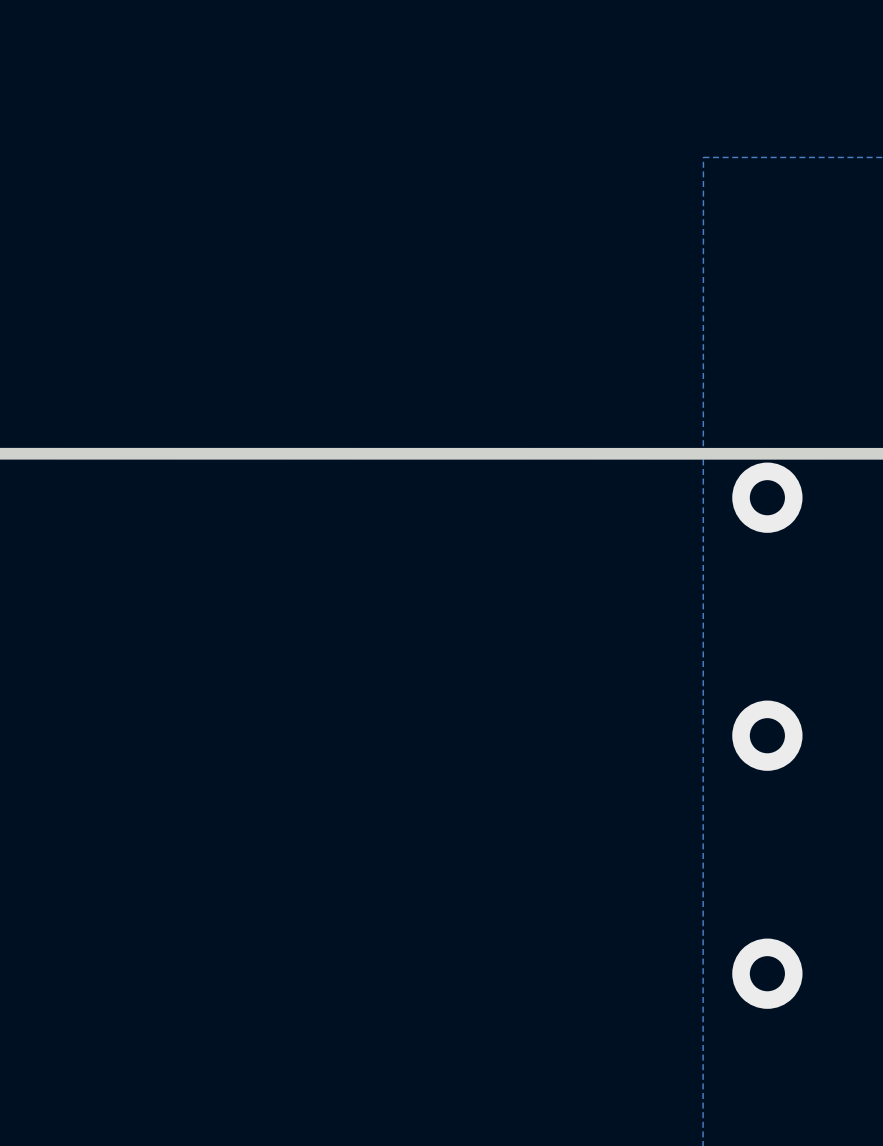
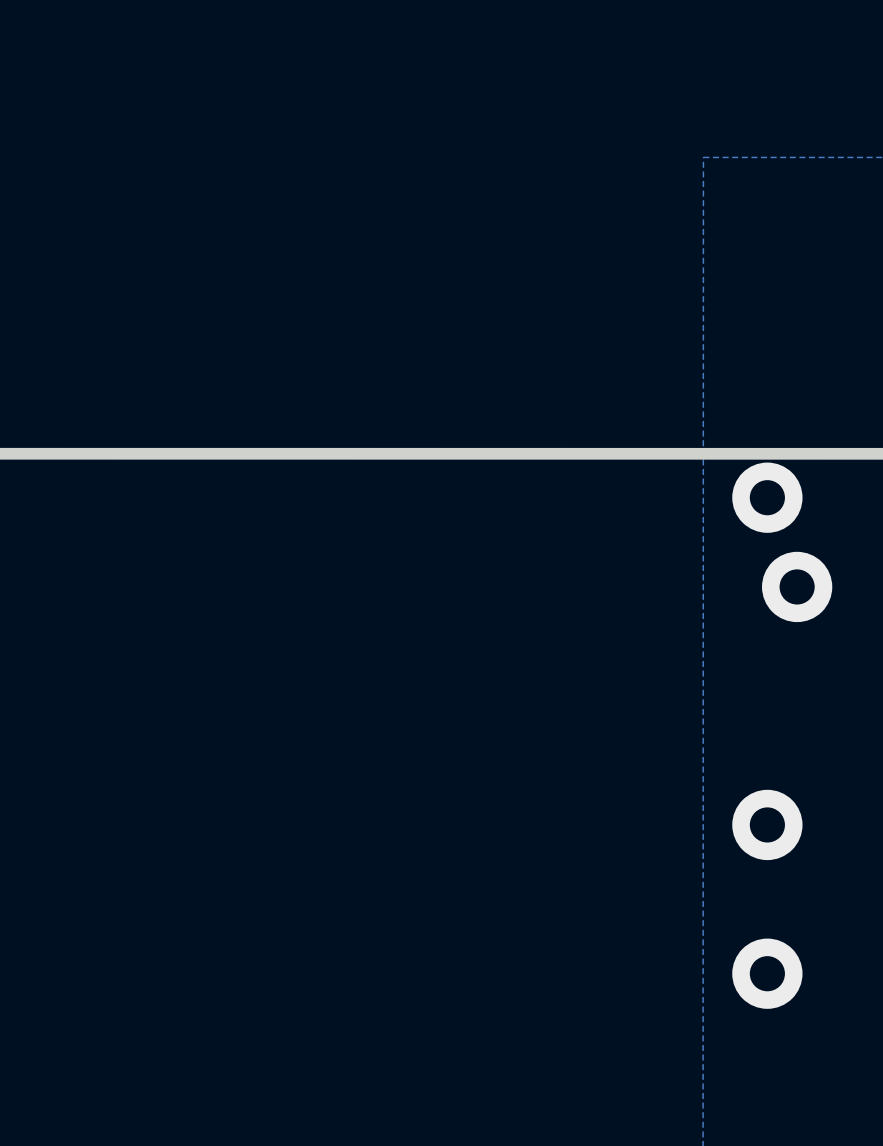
via: none -> (797, 586)
via: (767, 735) -> none
via: none -> (767, 824)

